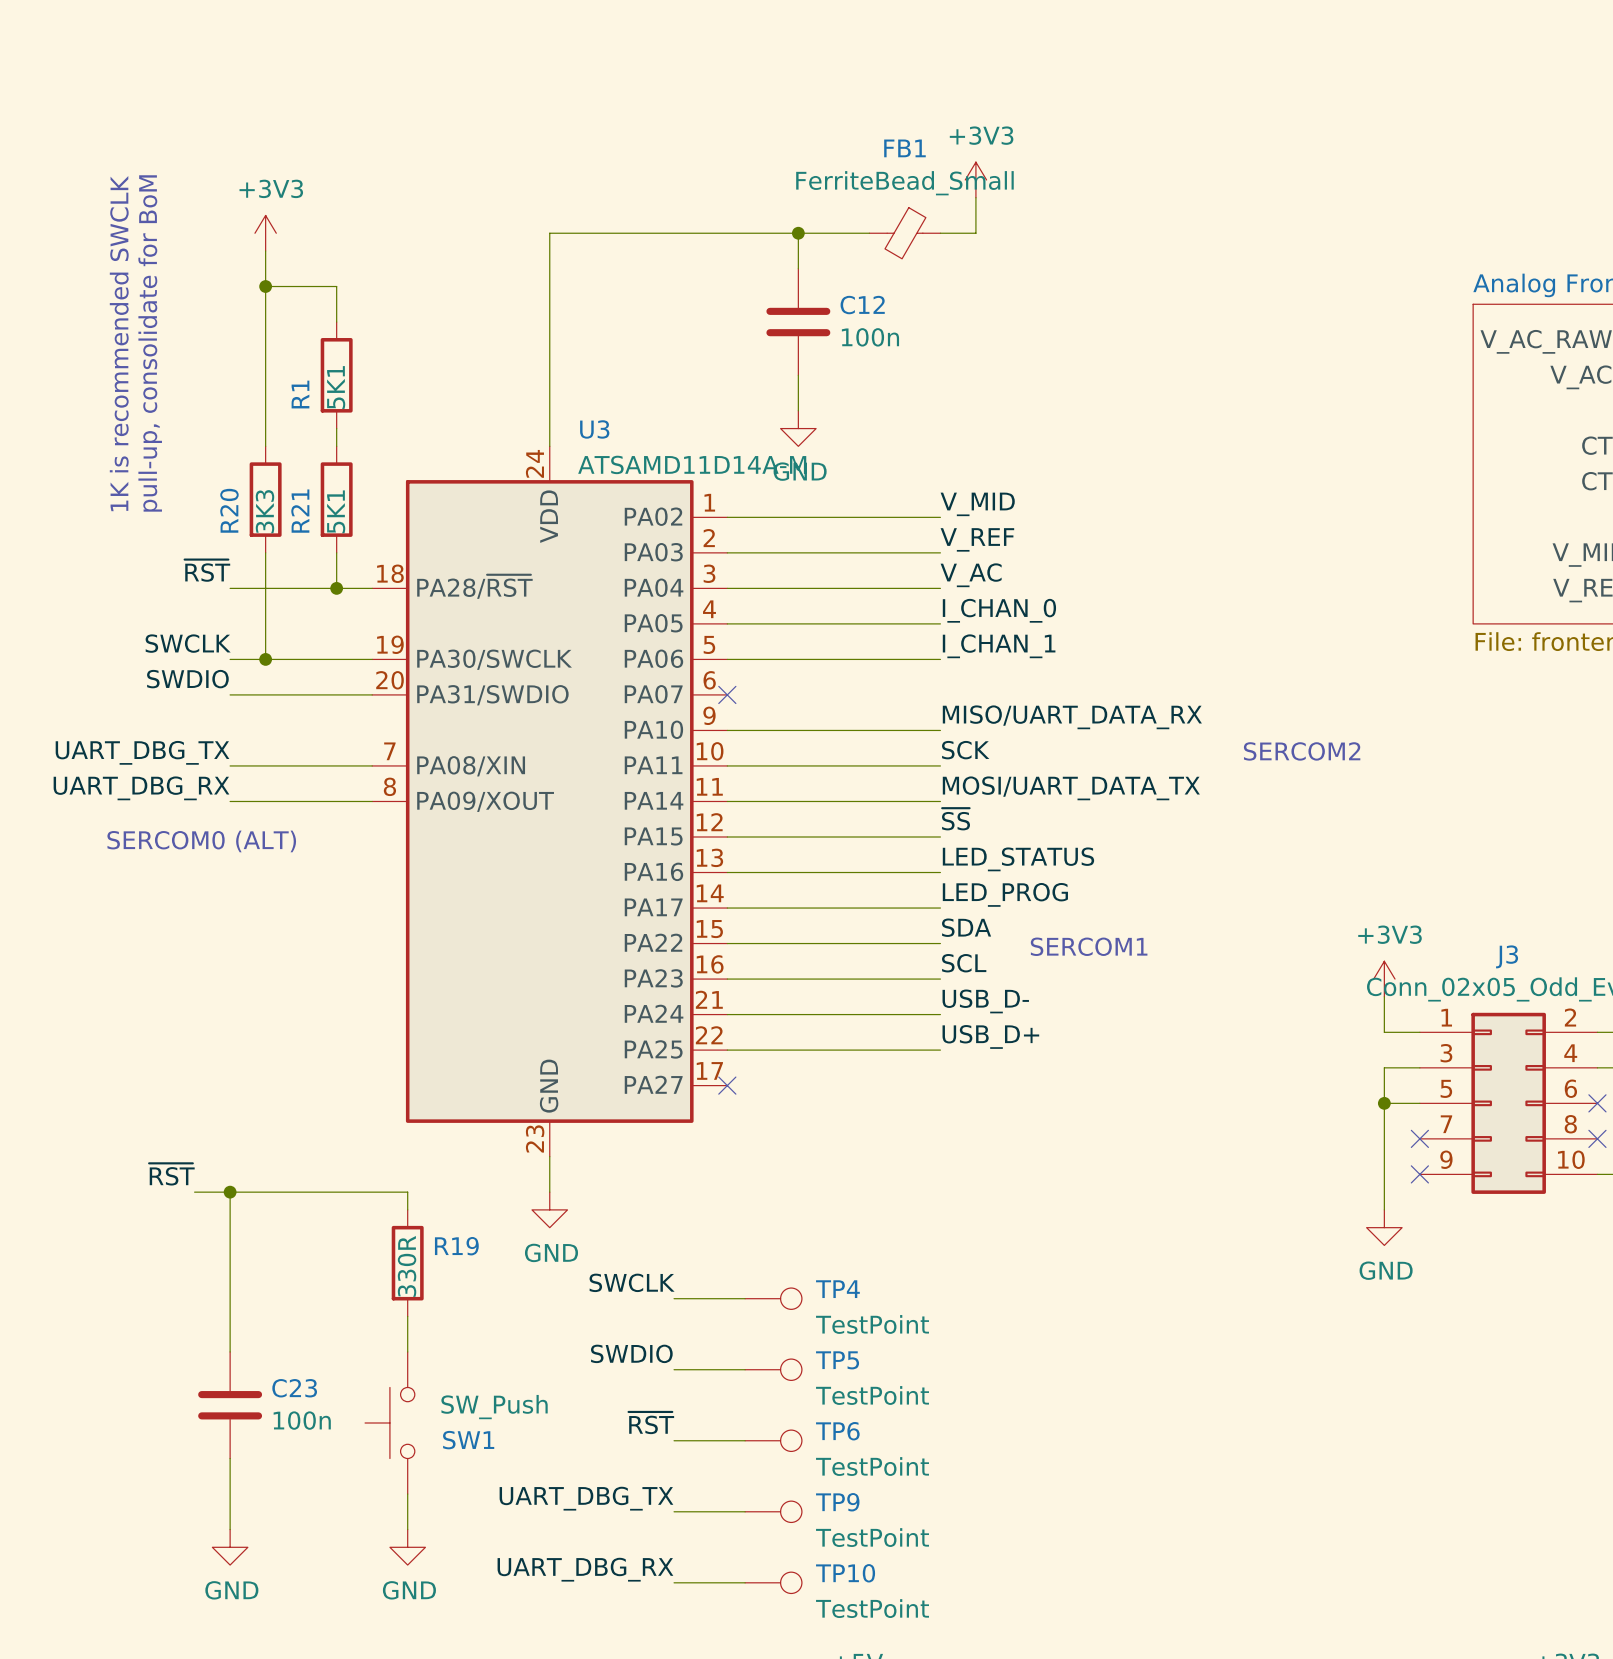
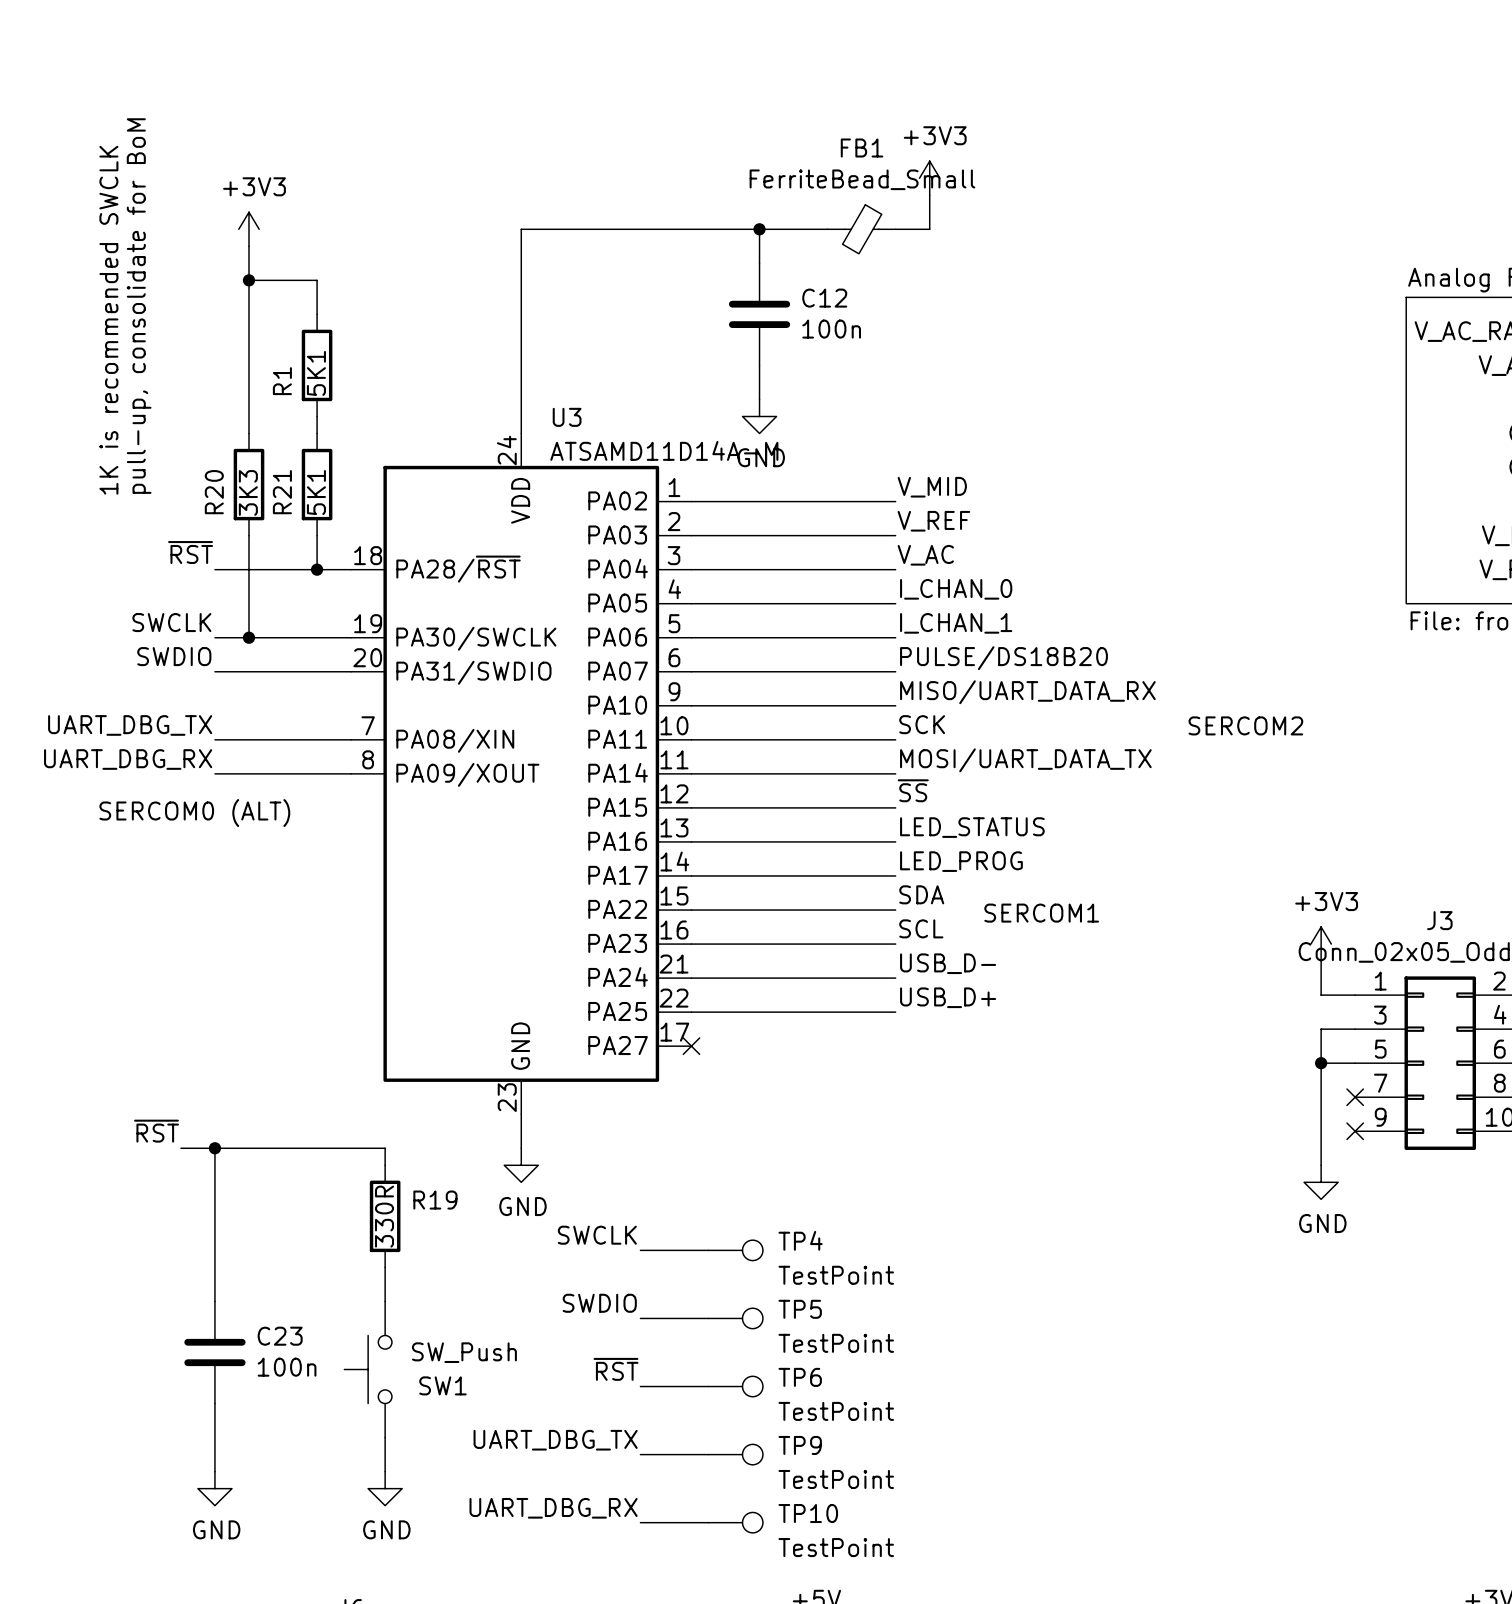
label: none -> PULSE/DS18B20 (1003, 658)
wire: none -> (691, 671) (895, 671)
no-connect mark: (727, 694) -> none

